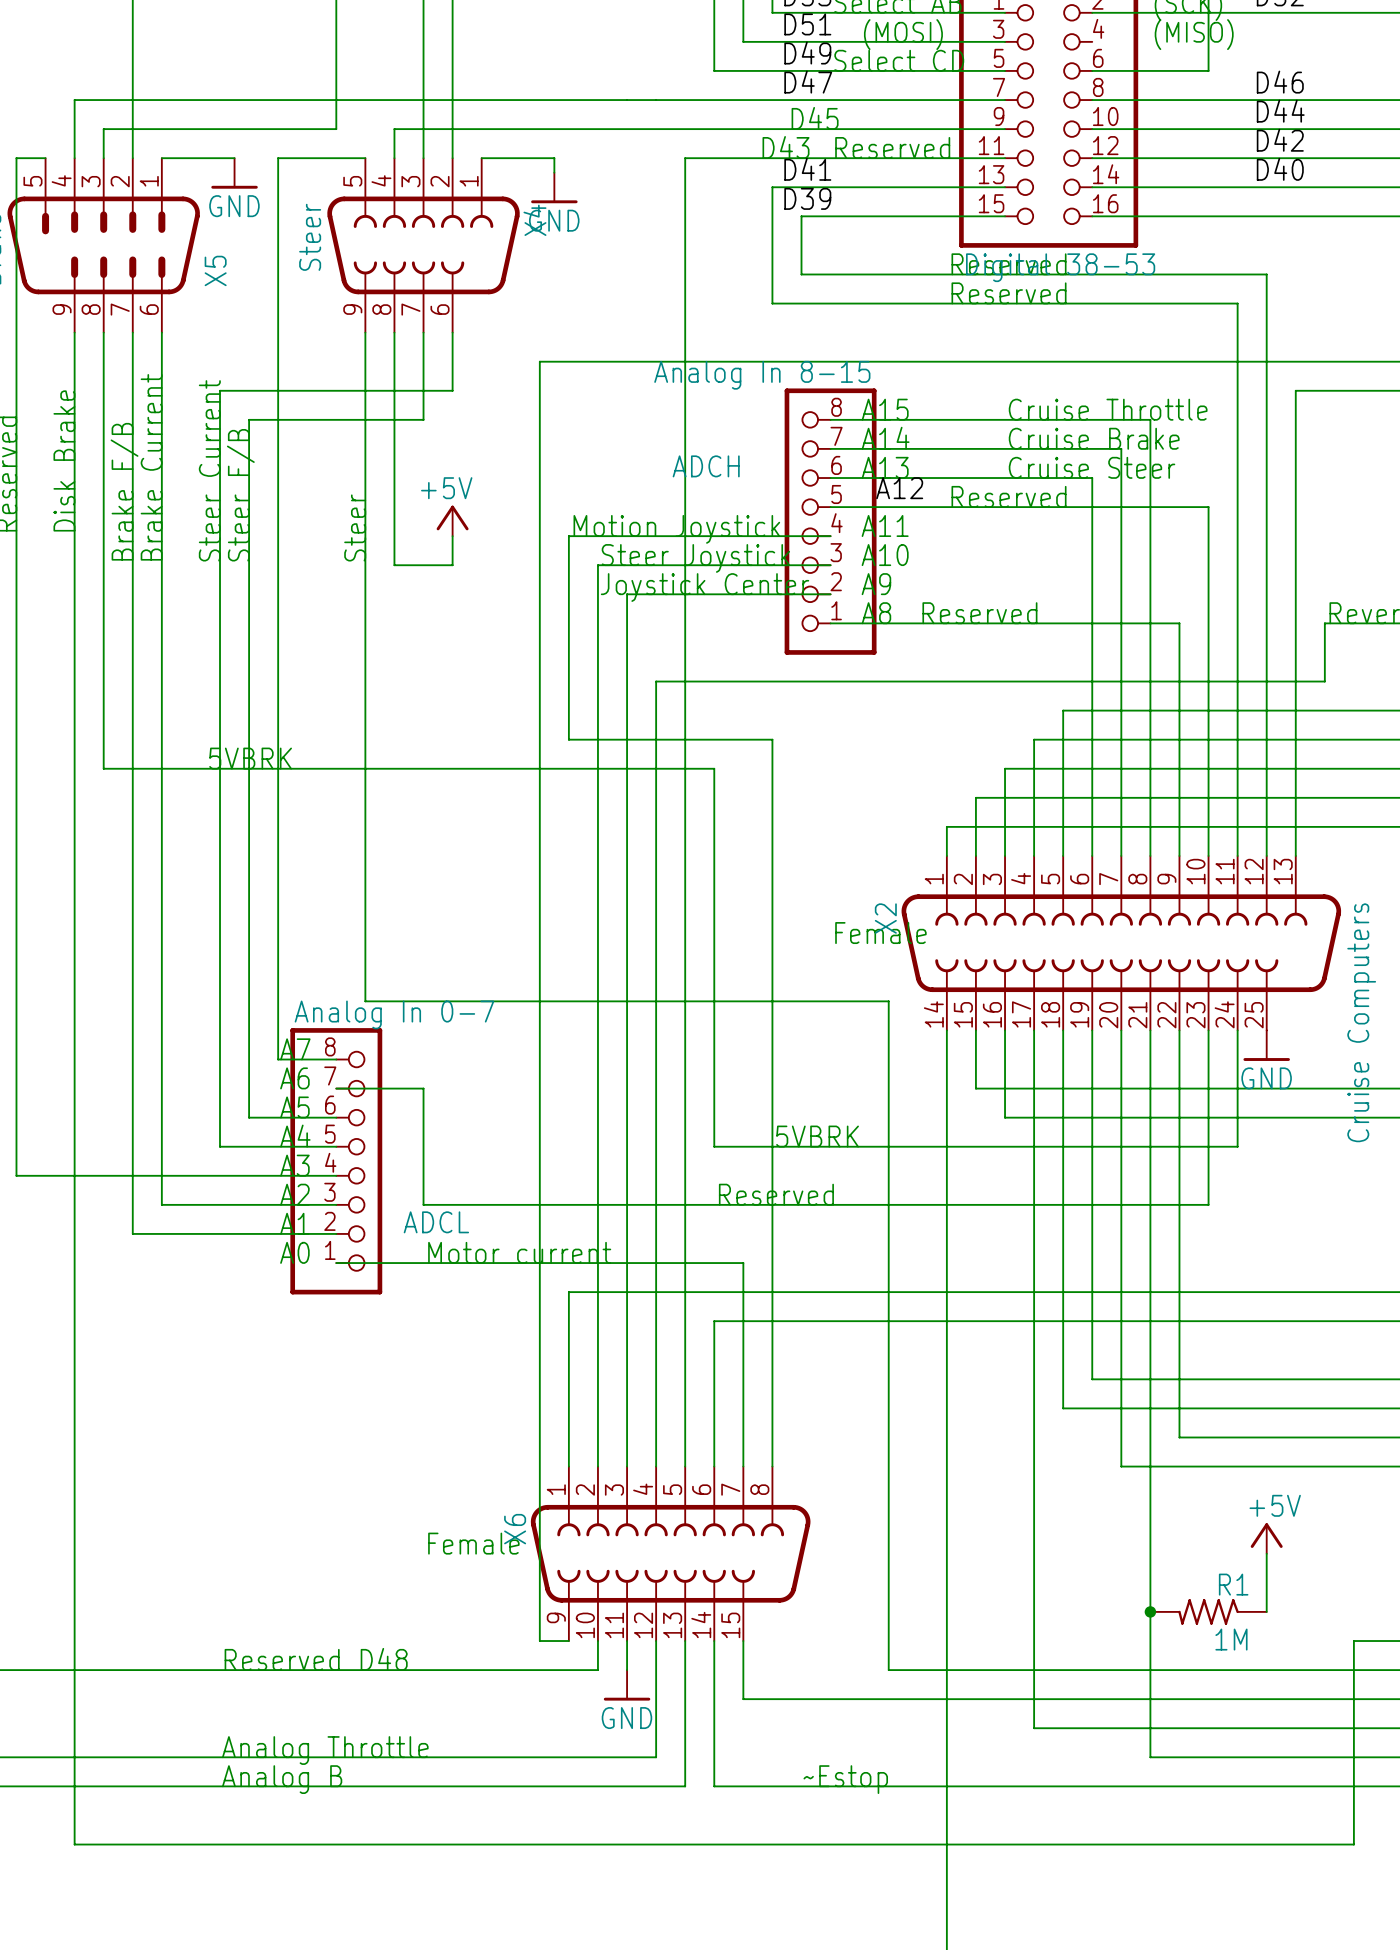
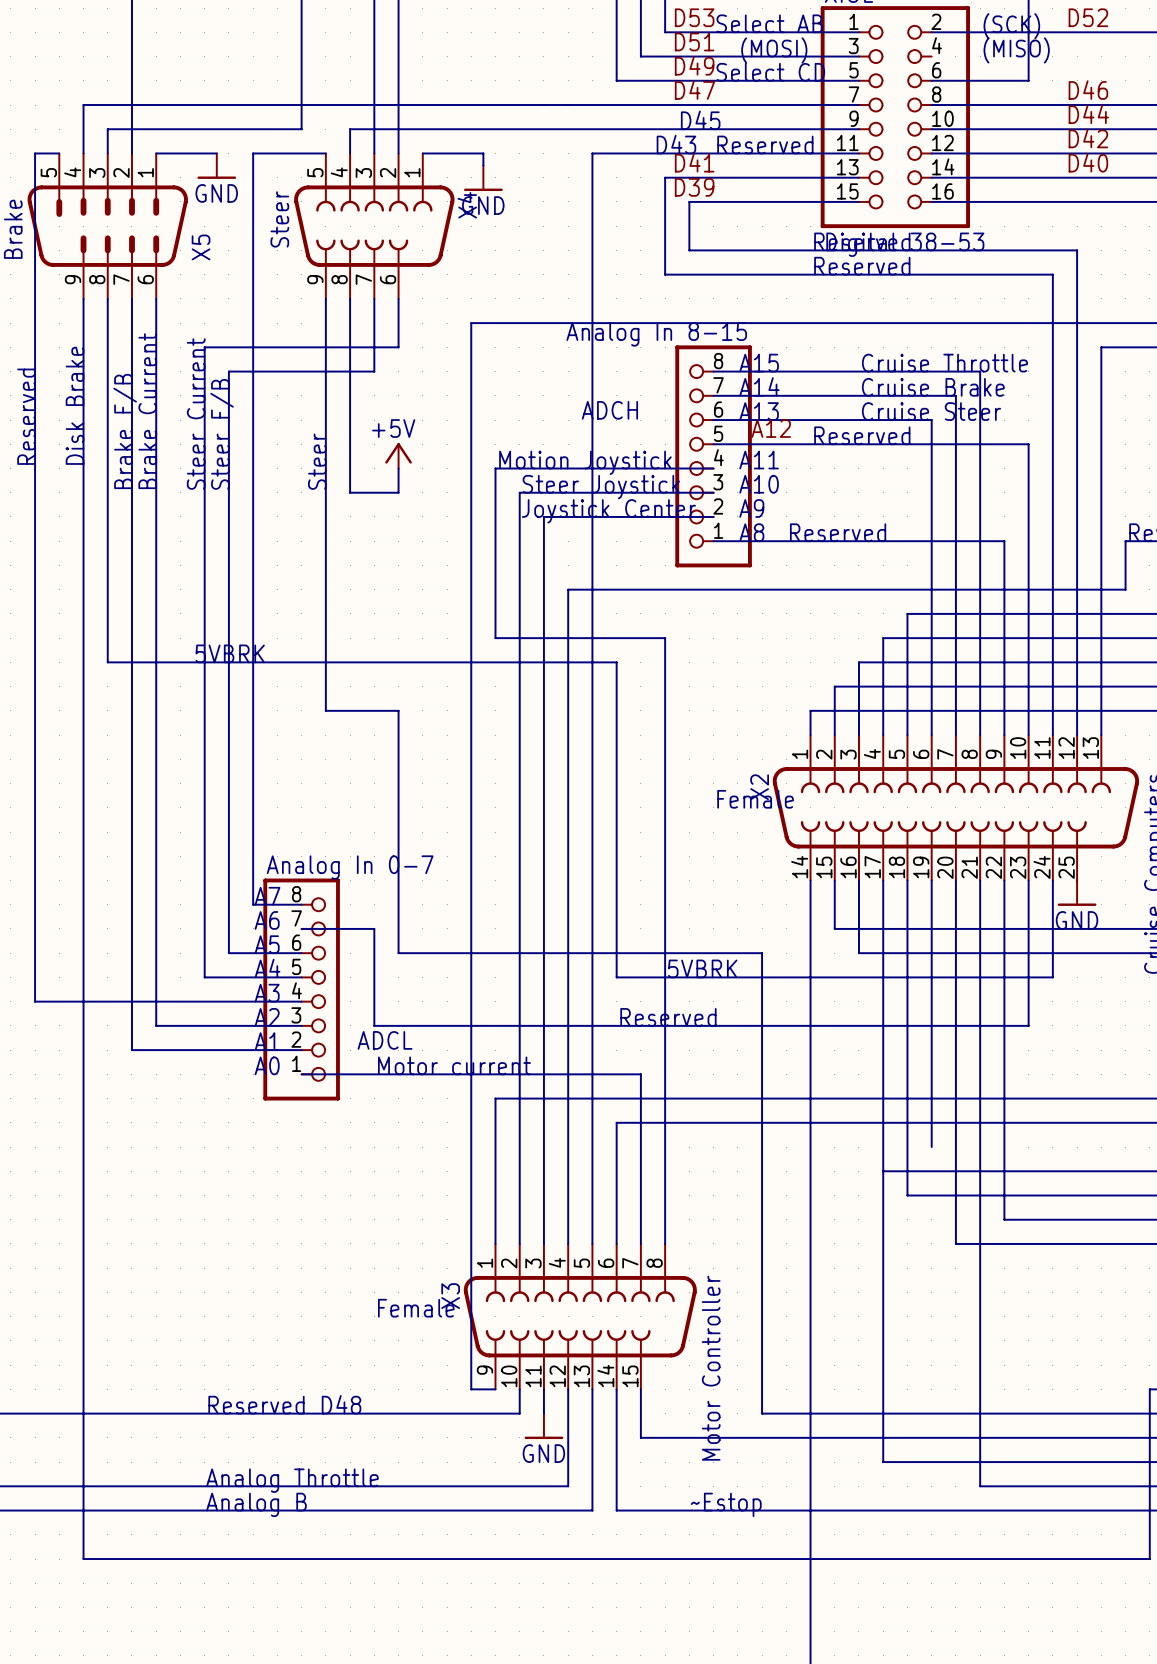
wire: (365, 826) (365, 1001) (888, 1001) (888, 1117) -> (325, 710) (398, 710) (398, 953) (762, 953)
wire: (1092, 1350) (1092, 1379) -> (883, 1171) (931, 1171)
X6 name: X6 (515, 1529) -> X3 (450, 1296)
power symbol: +5V (1266, 1538) -> none
wire: (1266, 1553) (1266, 1611) -> none
junction: (1150, 1611) -> none
R1: 1M (1208, 1611) -> none
X6 value: none -> Motor Controller (711, 1368)

